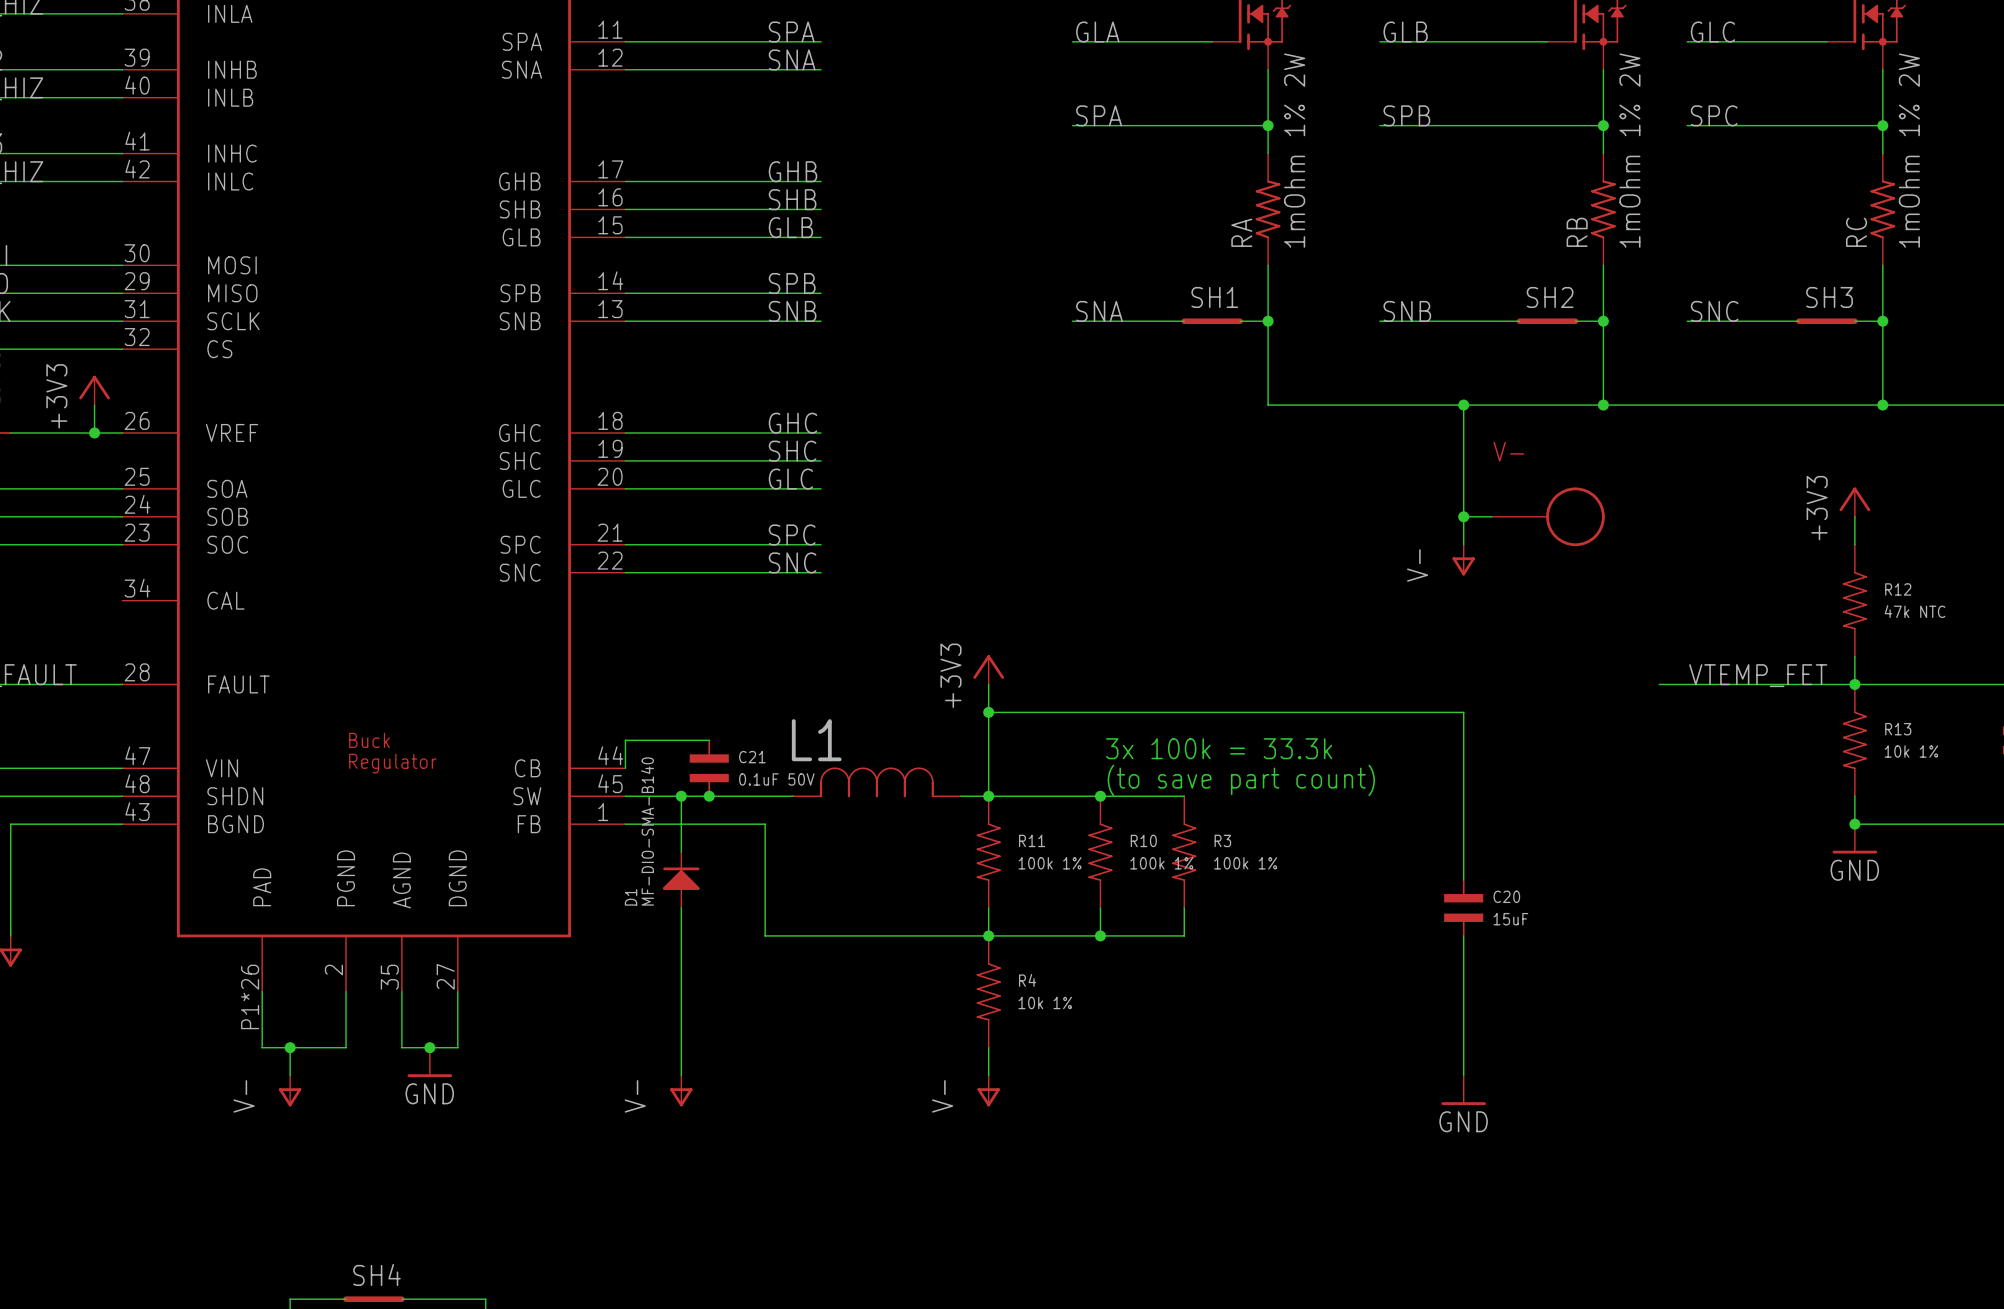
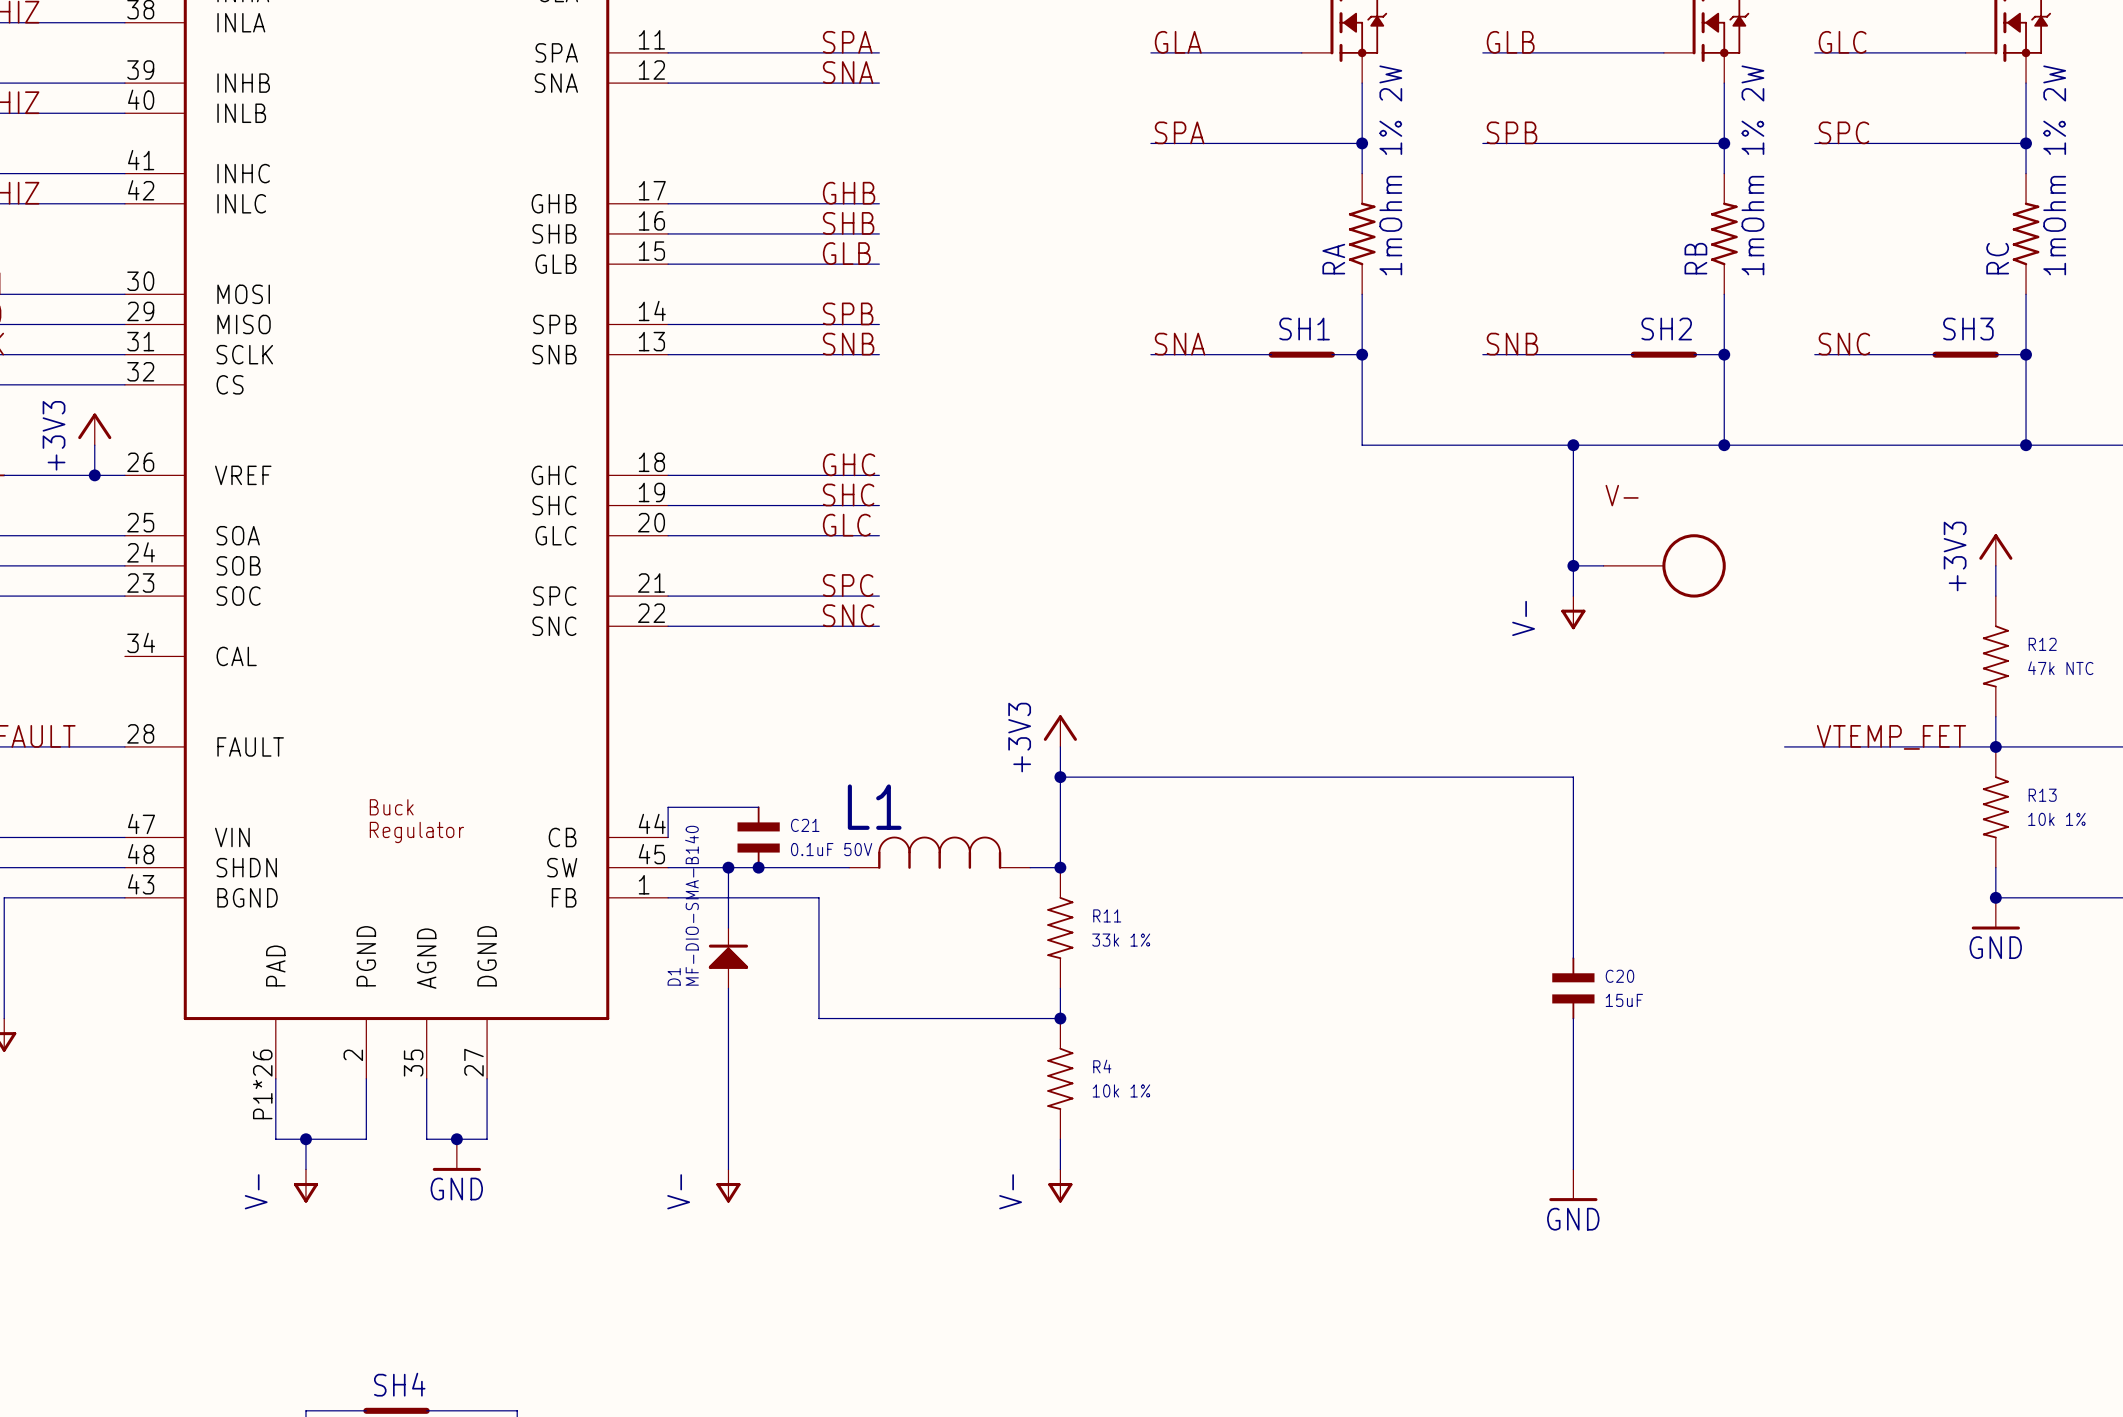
text: 3x 100k = 33.3k (1219, 748) -> none
text: (to save part count) (1241, 780) -> none
wire: (988, 796) (1184, 796) -> none
junction: (1100, 796) -> none
R10: 100k 1% (1100, 852) -> none
R3: 100k 1% (1184, 852) -> none
R11 value: 100k 1% (1050, 863) -> 33k 1% (1121, 940)
wire: (1100, 908) (1100, 935) -> none
wire: (1184, 908) (1184, 935) (988, 935) -> none
junction: (1100, 935) -> none

